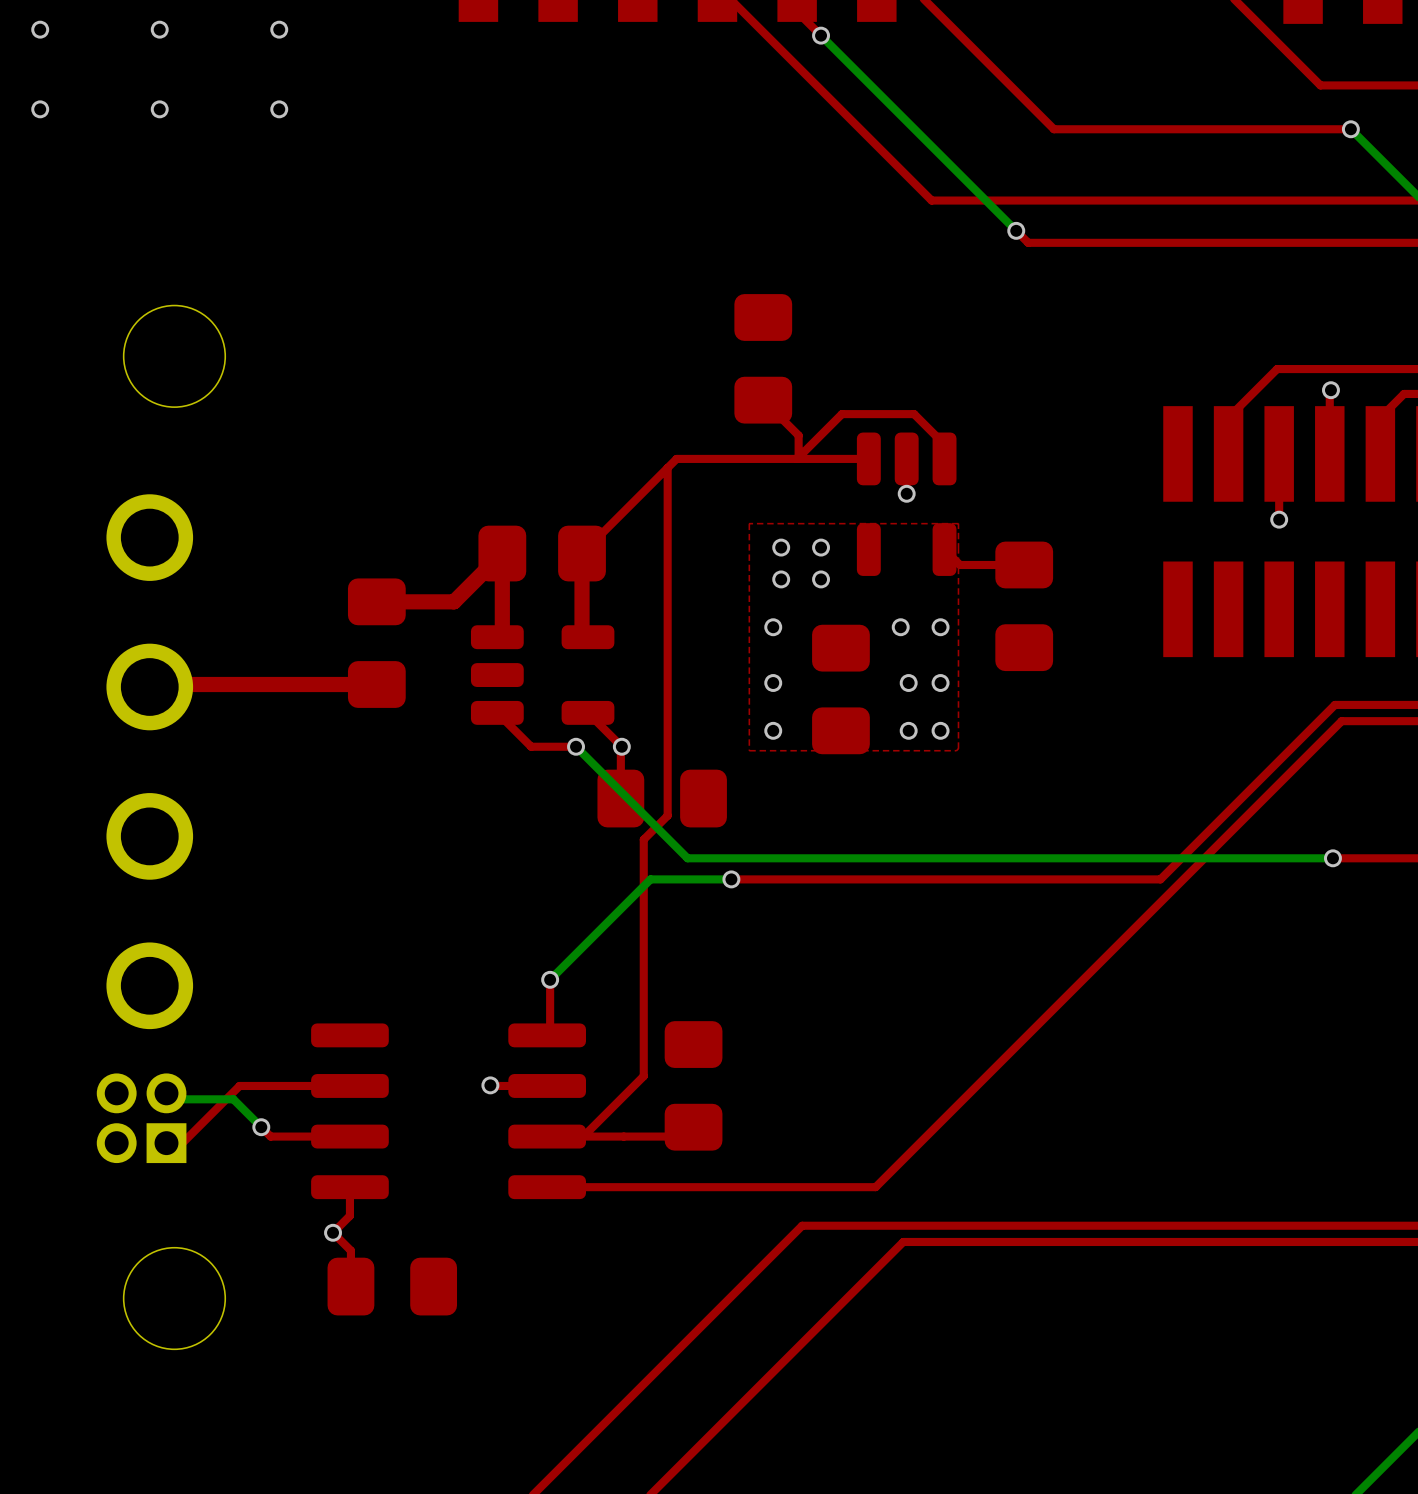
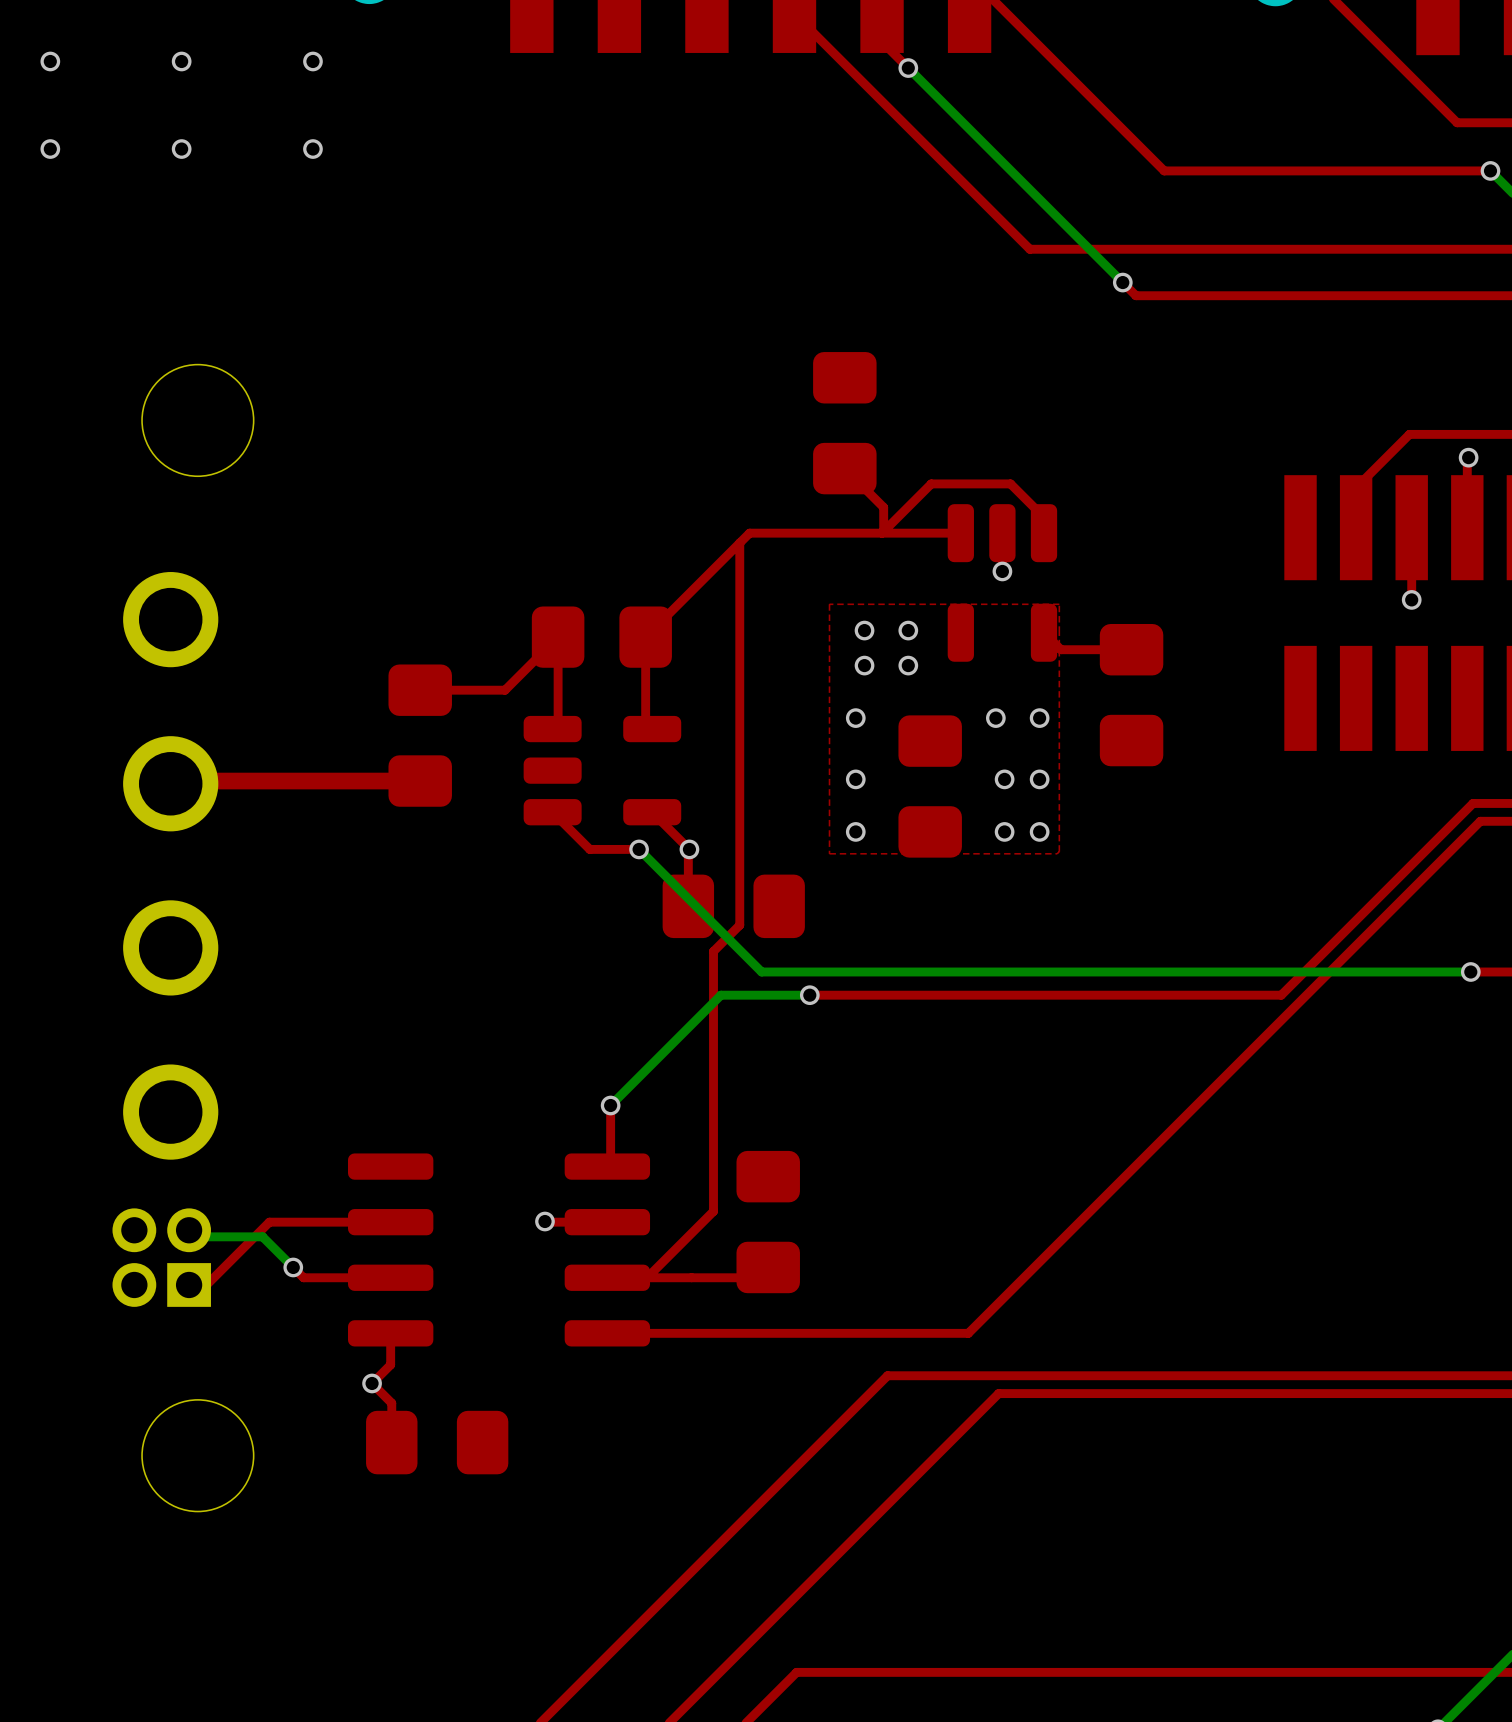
top track width: thick (582, 553) (582, 631) -> thin (645, 637) (645, 722)
top track width: thick (376, 601) (454, 601) (502, 553) (502, 632) -> thin (420, 690) (505, 690) (558, 637) (558, 723)

